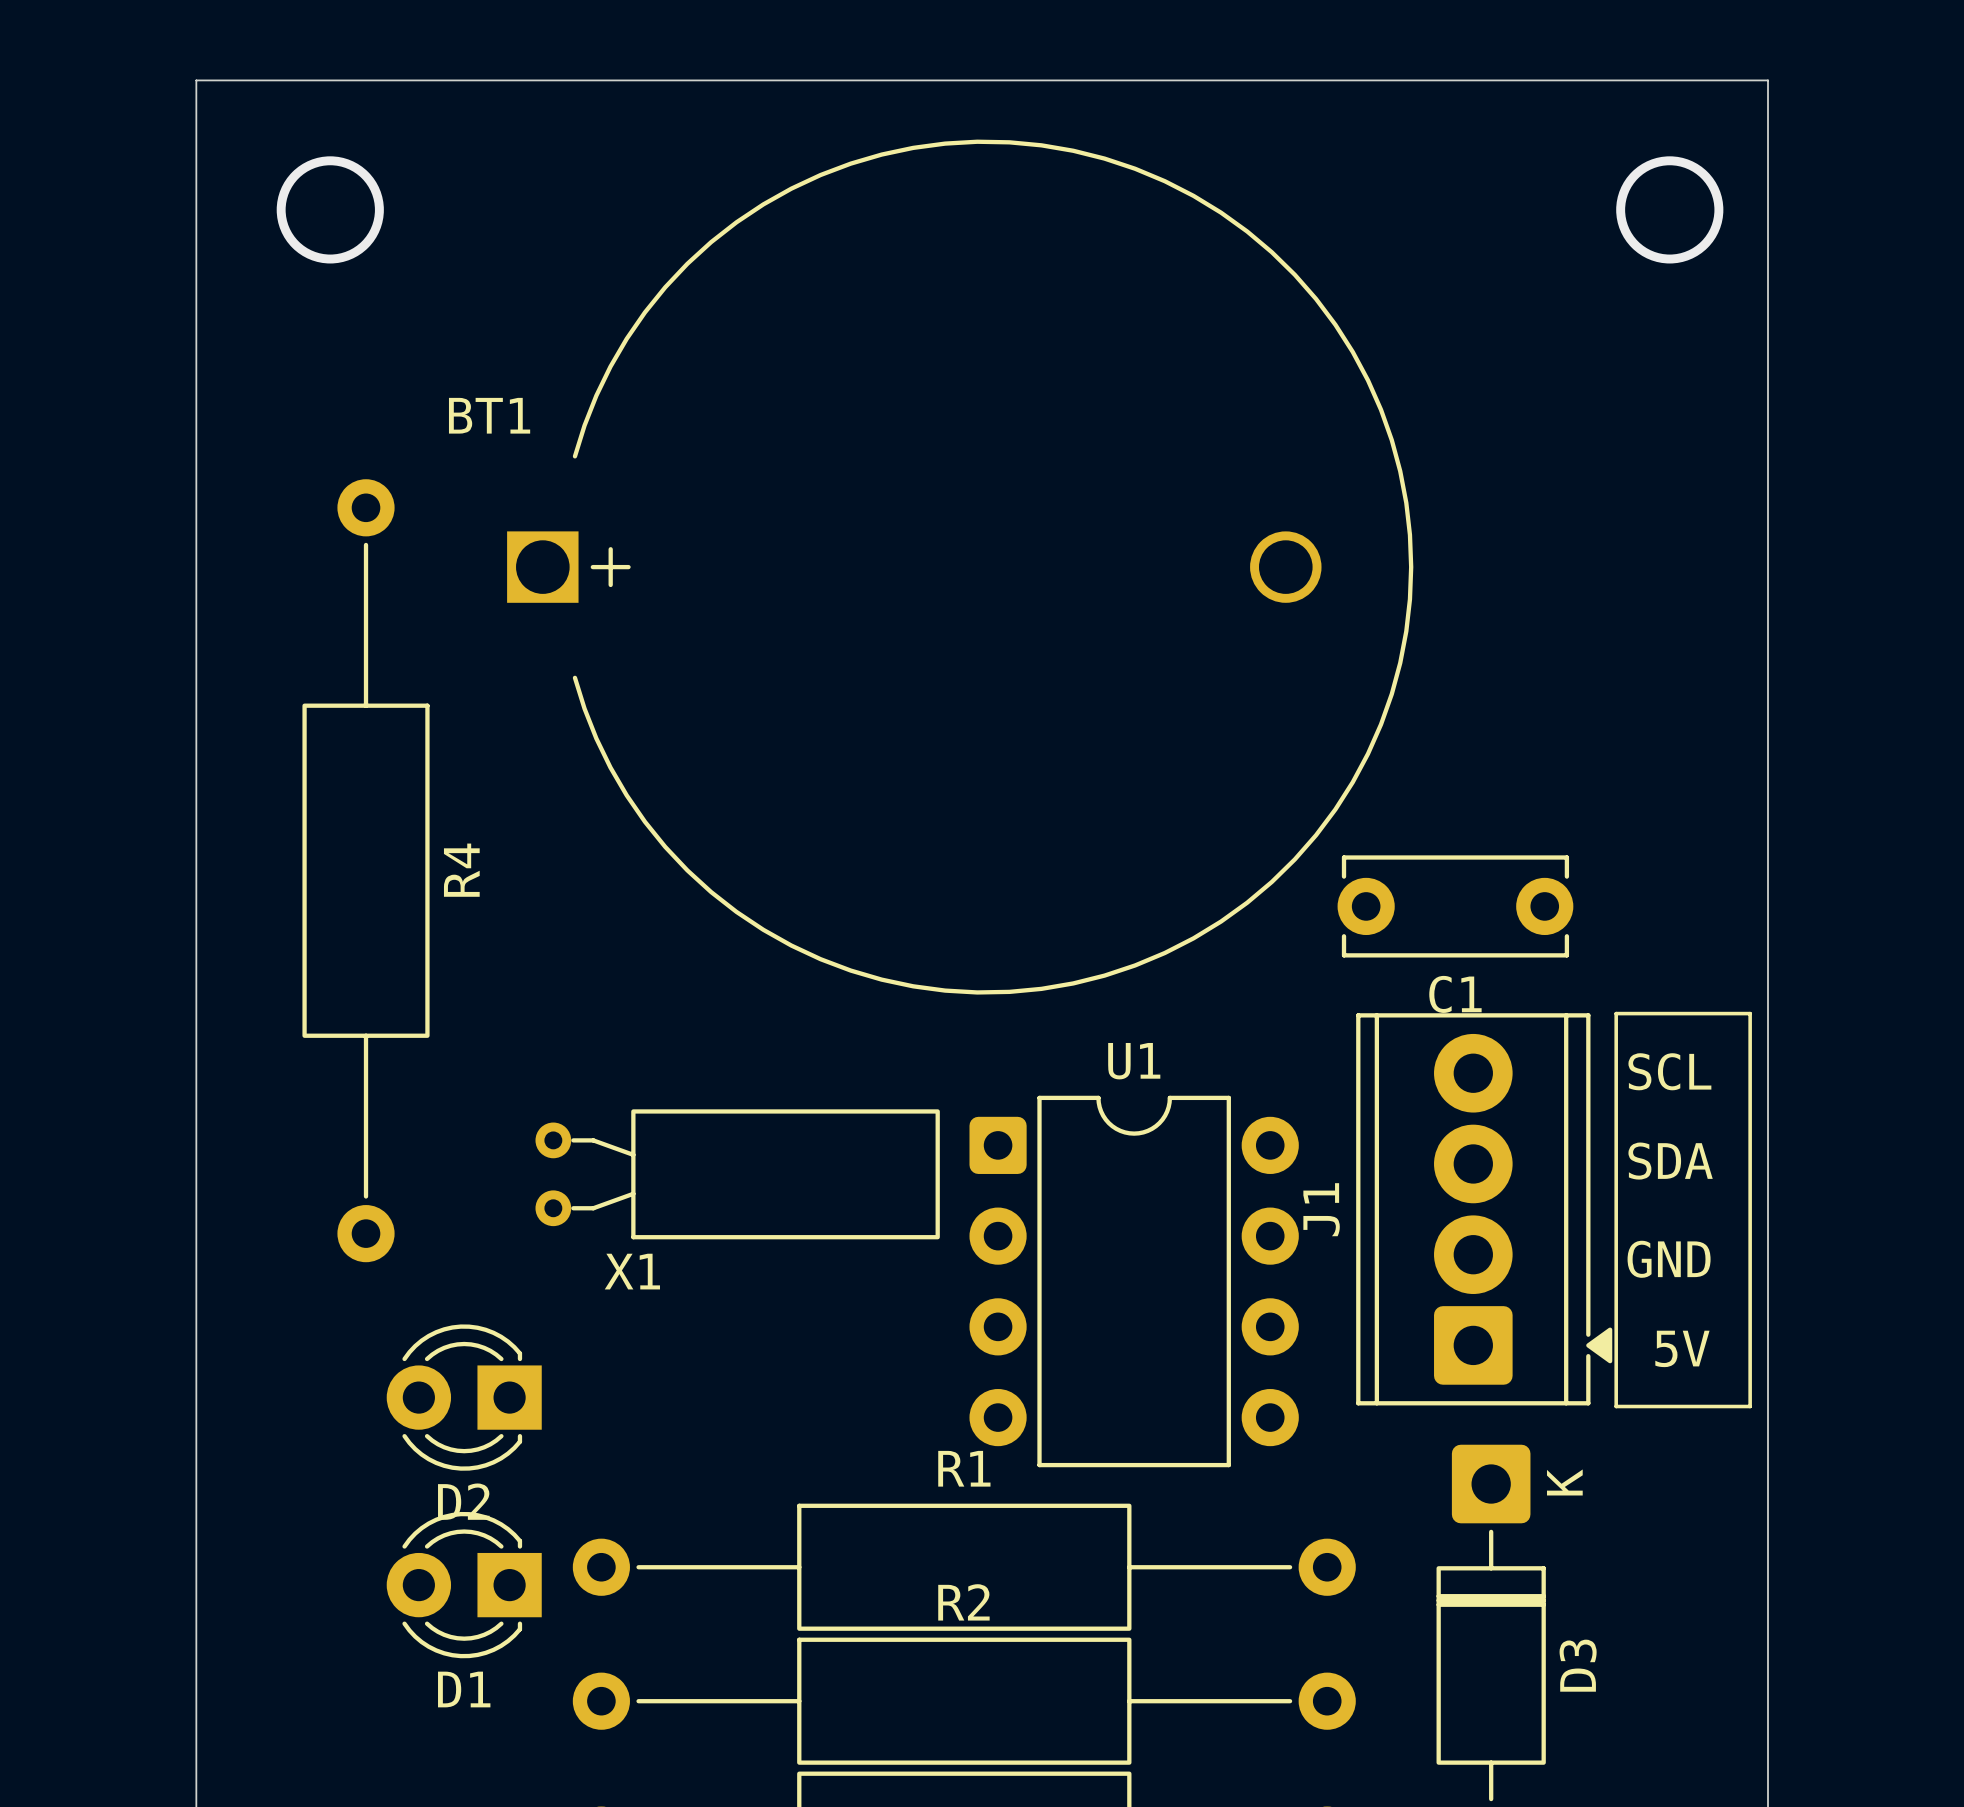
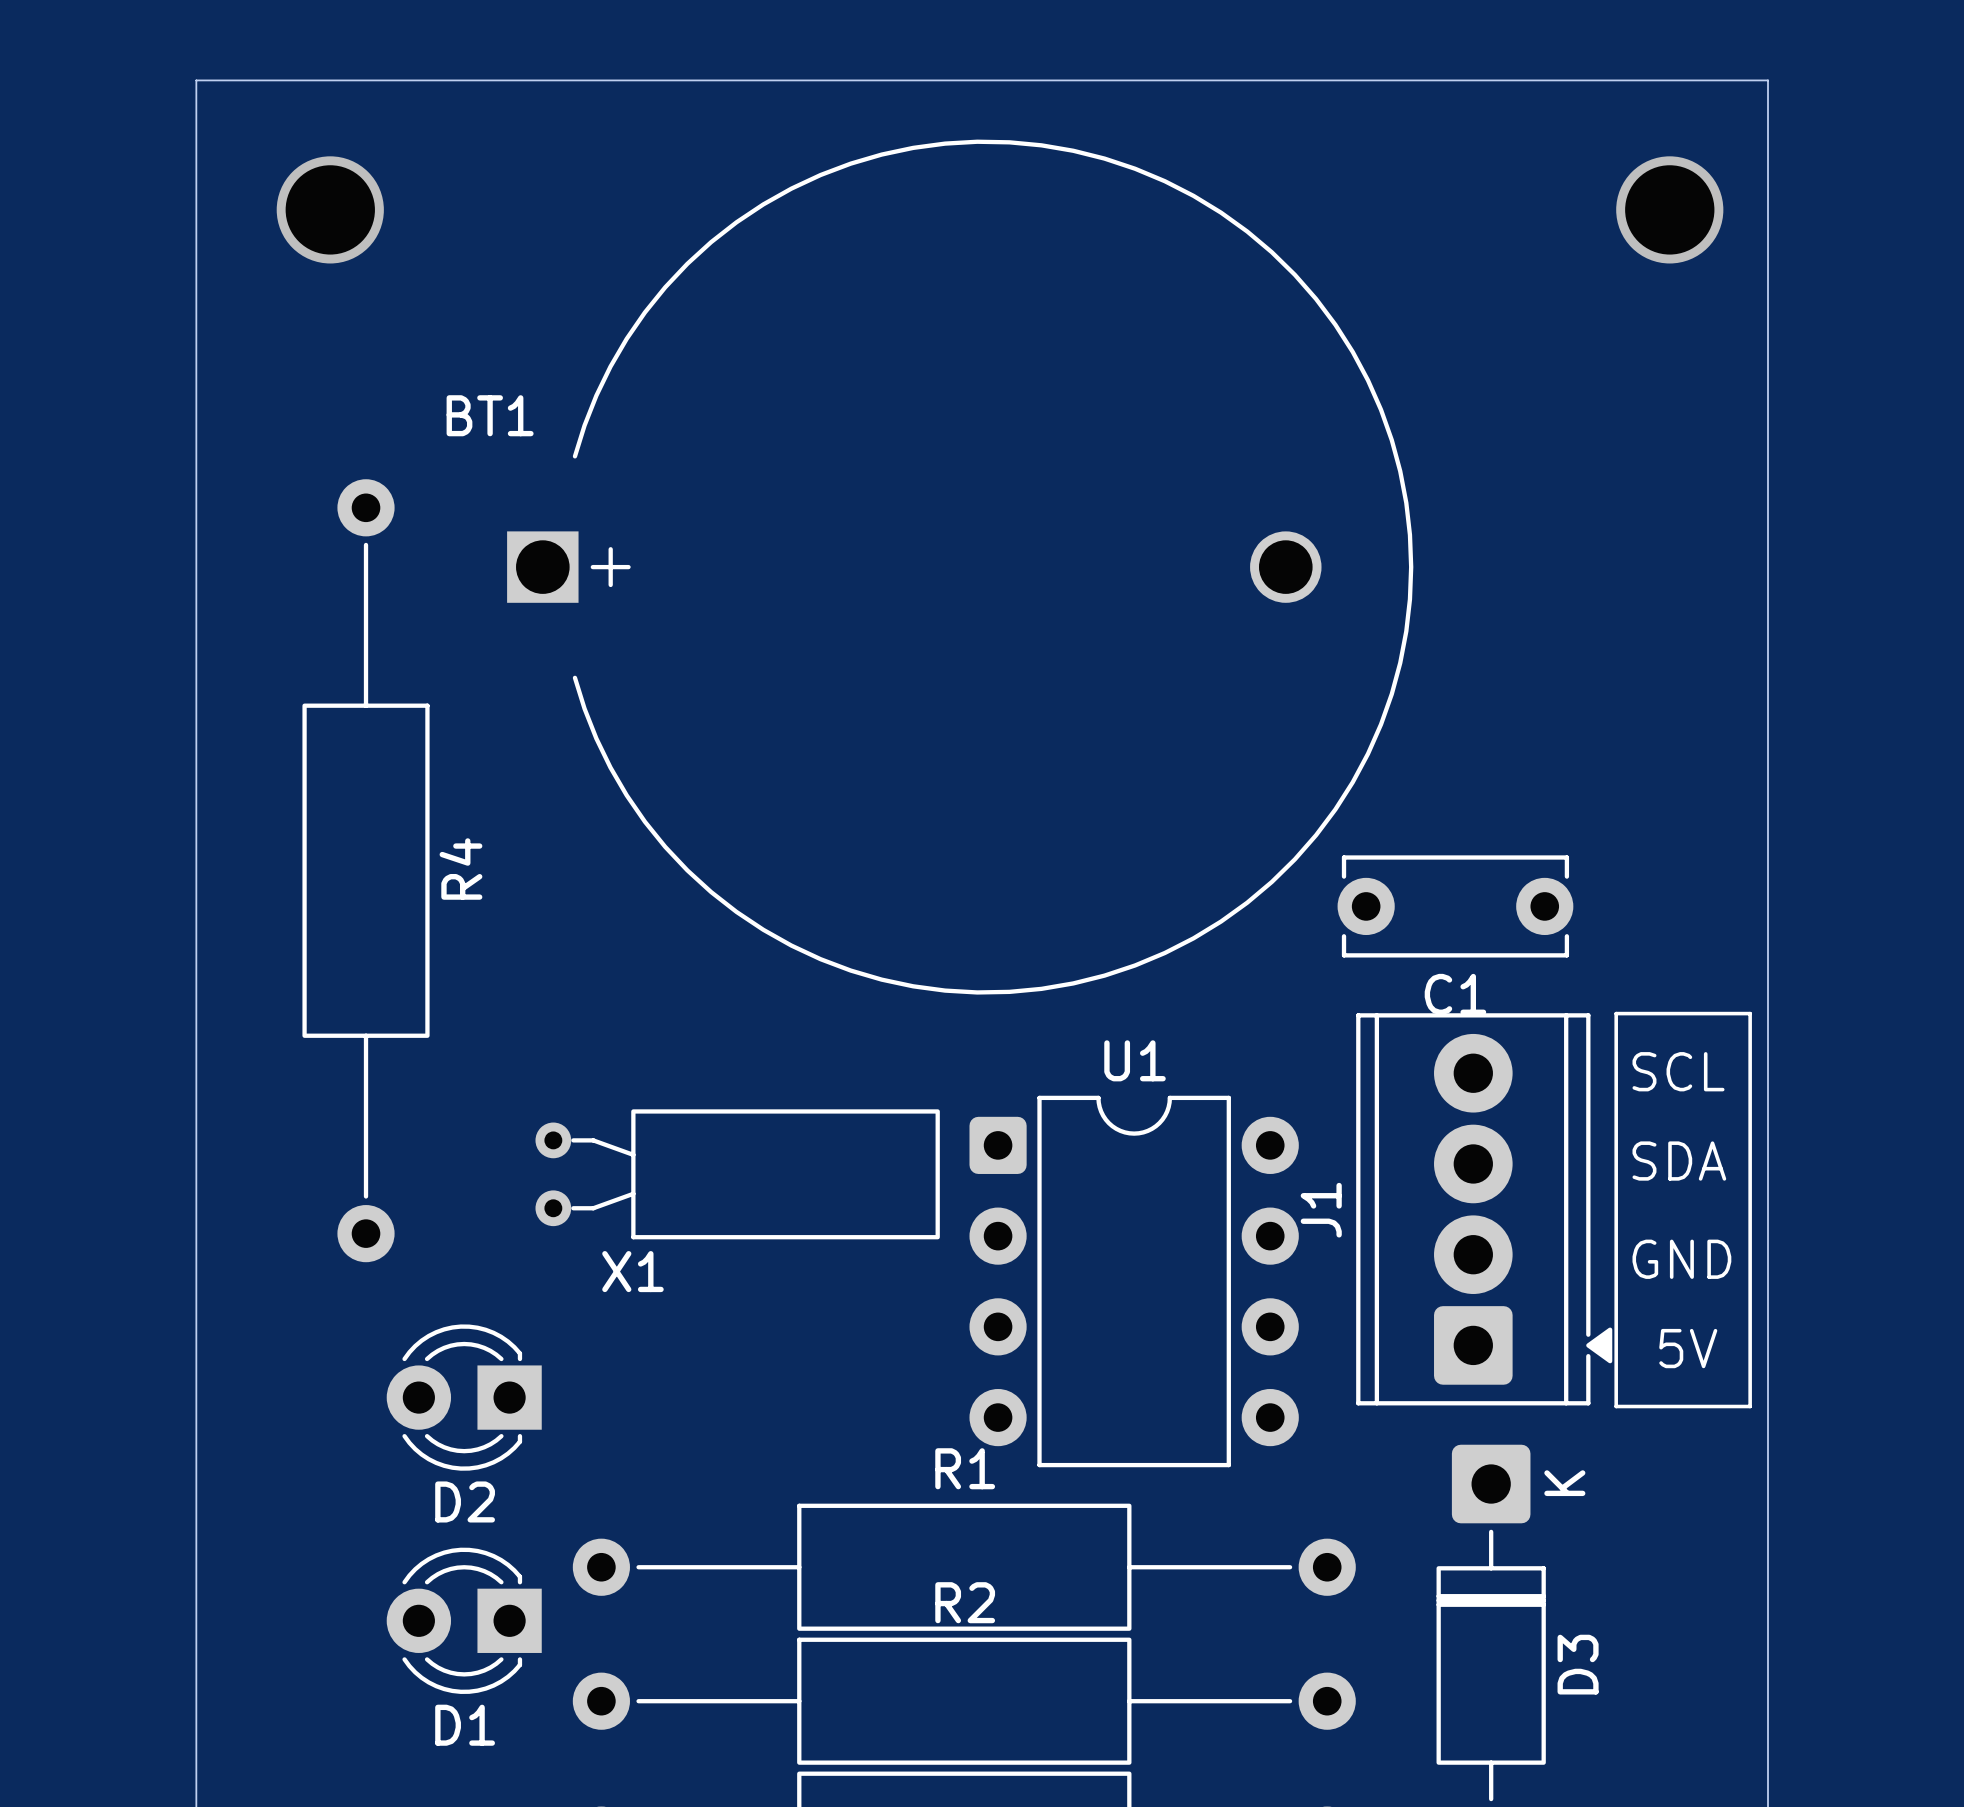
D1 position: (464, 1585) -> (464, 1620)

